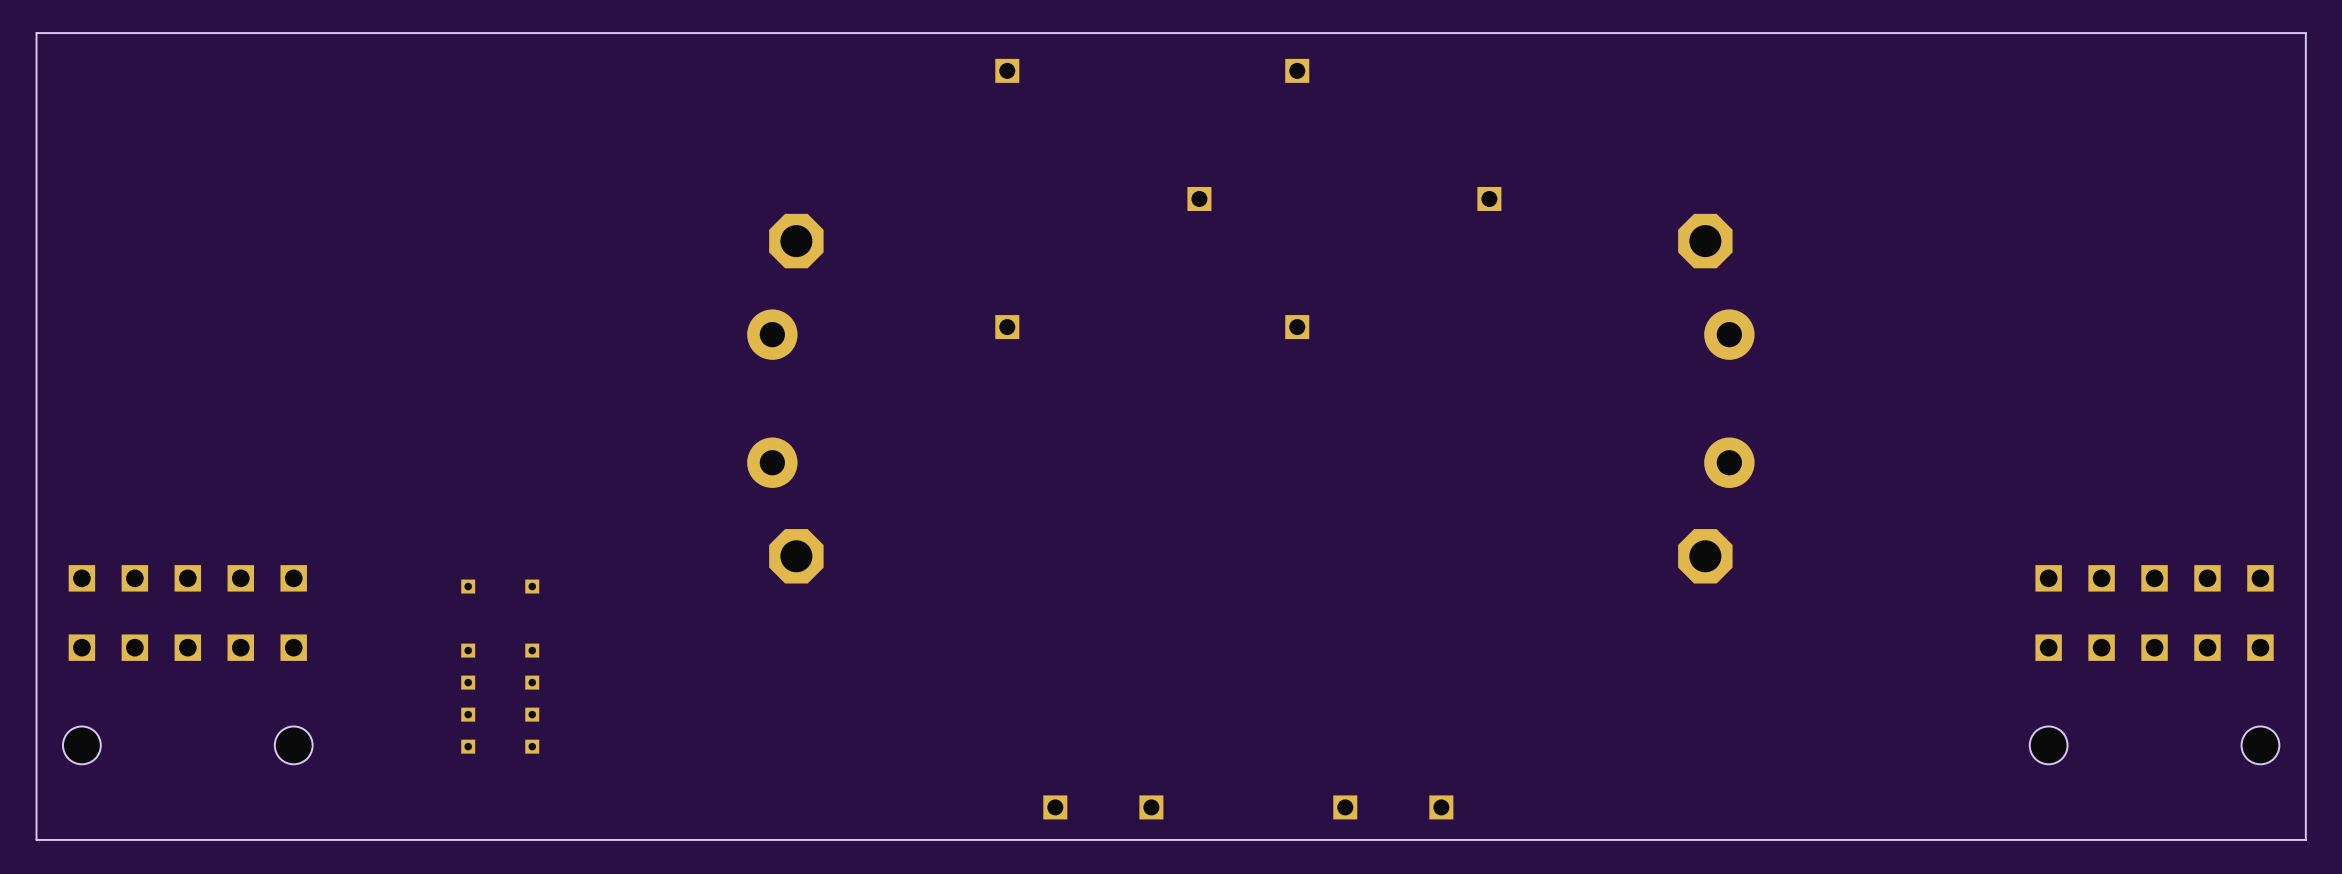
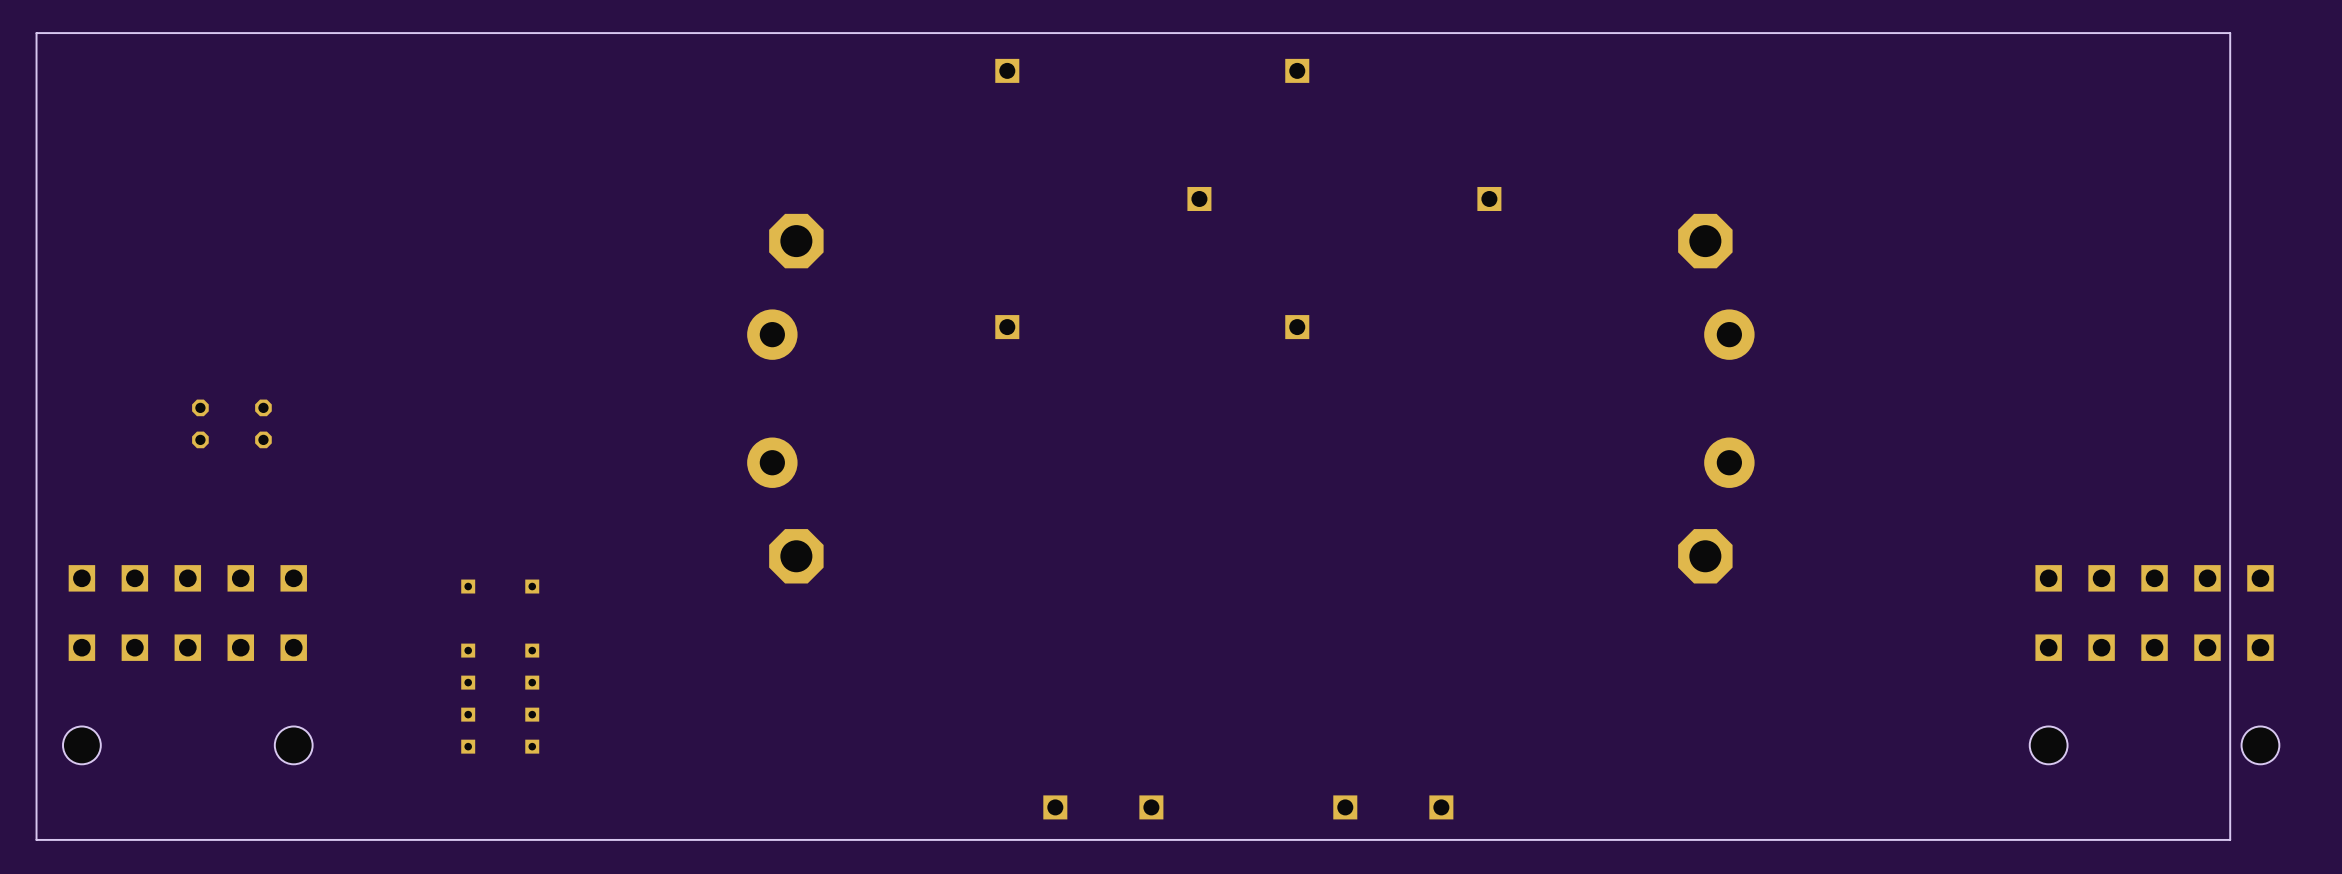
board edge: (2230, 33) (2305, 33) (2305, 839) (2230, 839) -> (2230, 33) (2230, 839)
part: none -> (200, 423)
part: none -> (263, 423)

